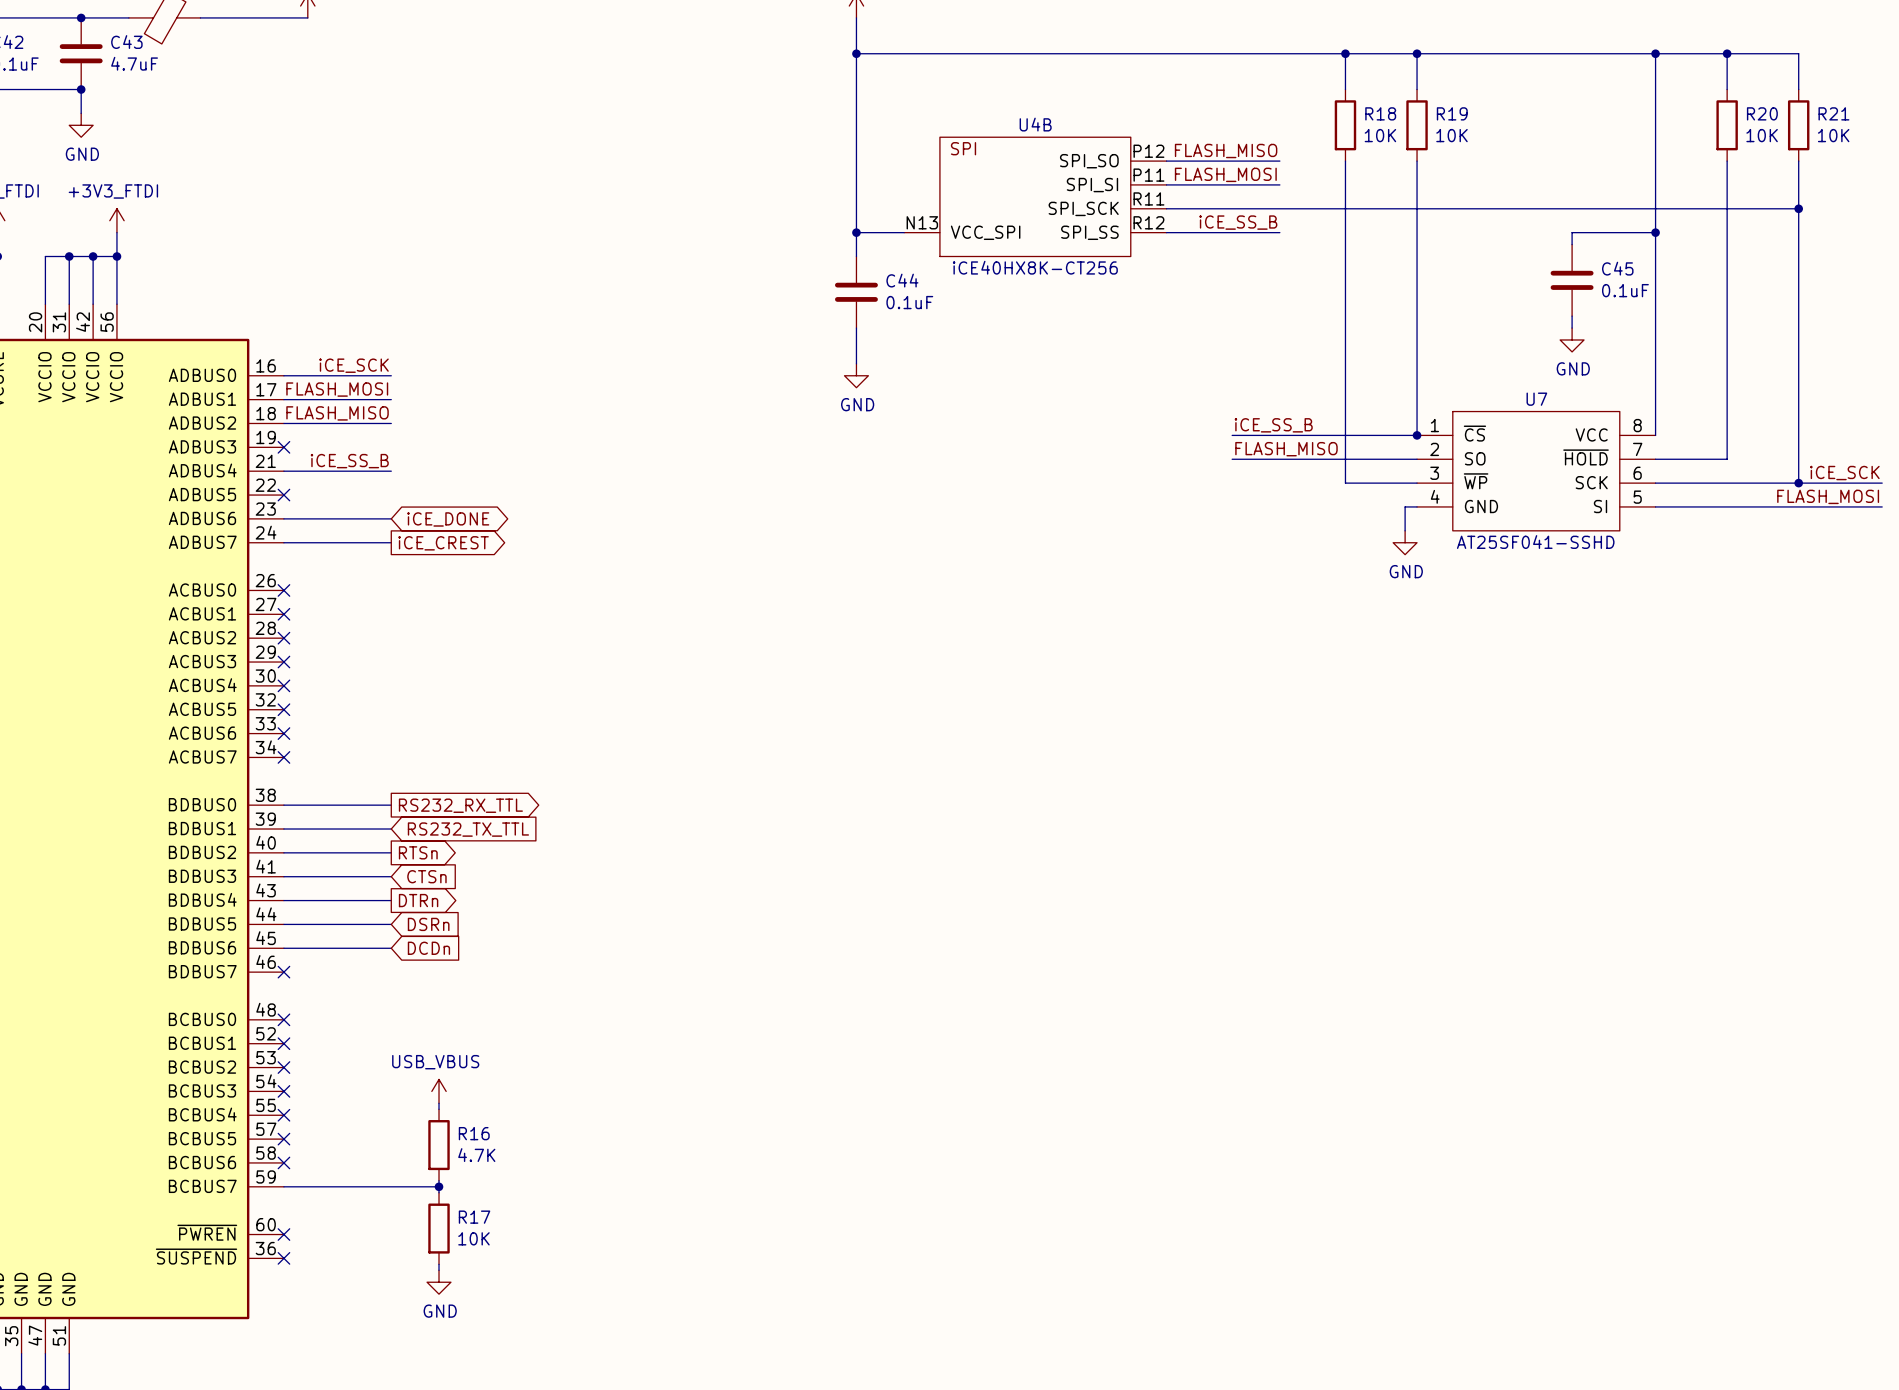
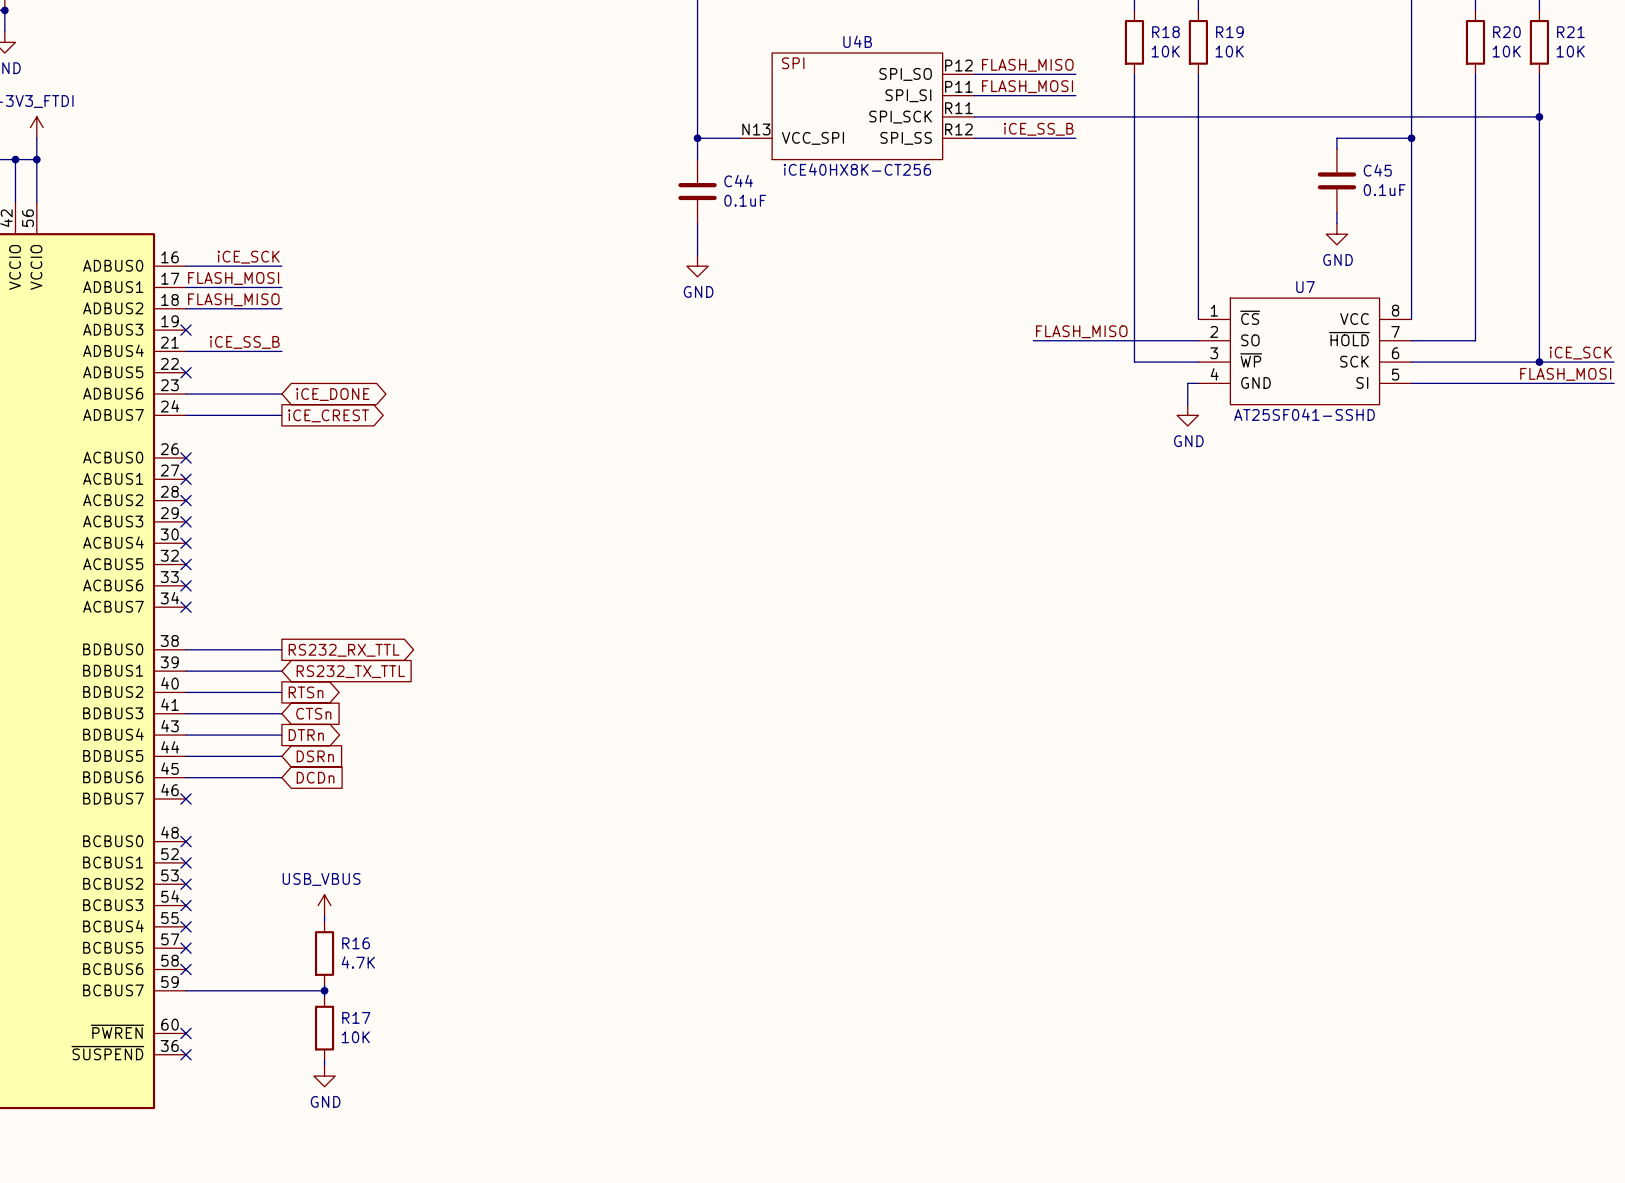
label: iCE_SS_B (1273, 425) -> none
wire: (1232, 435) (1417, 435) -> none
junction: (1417, 435) -> none

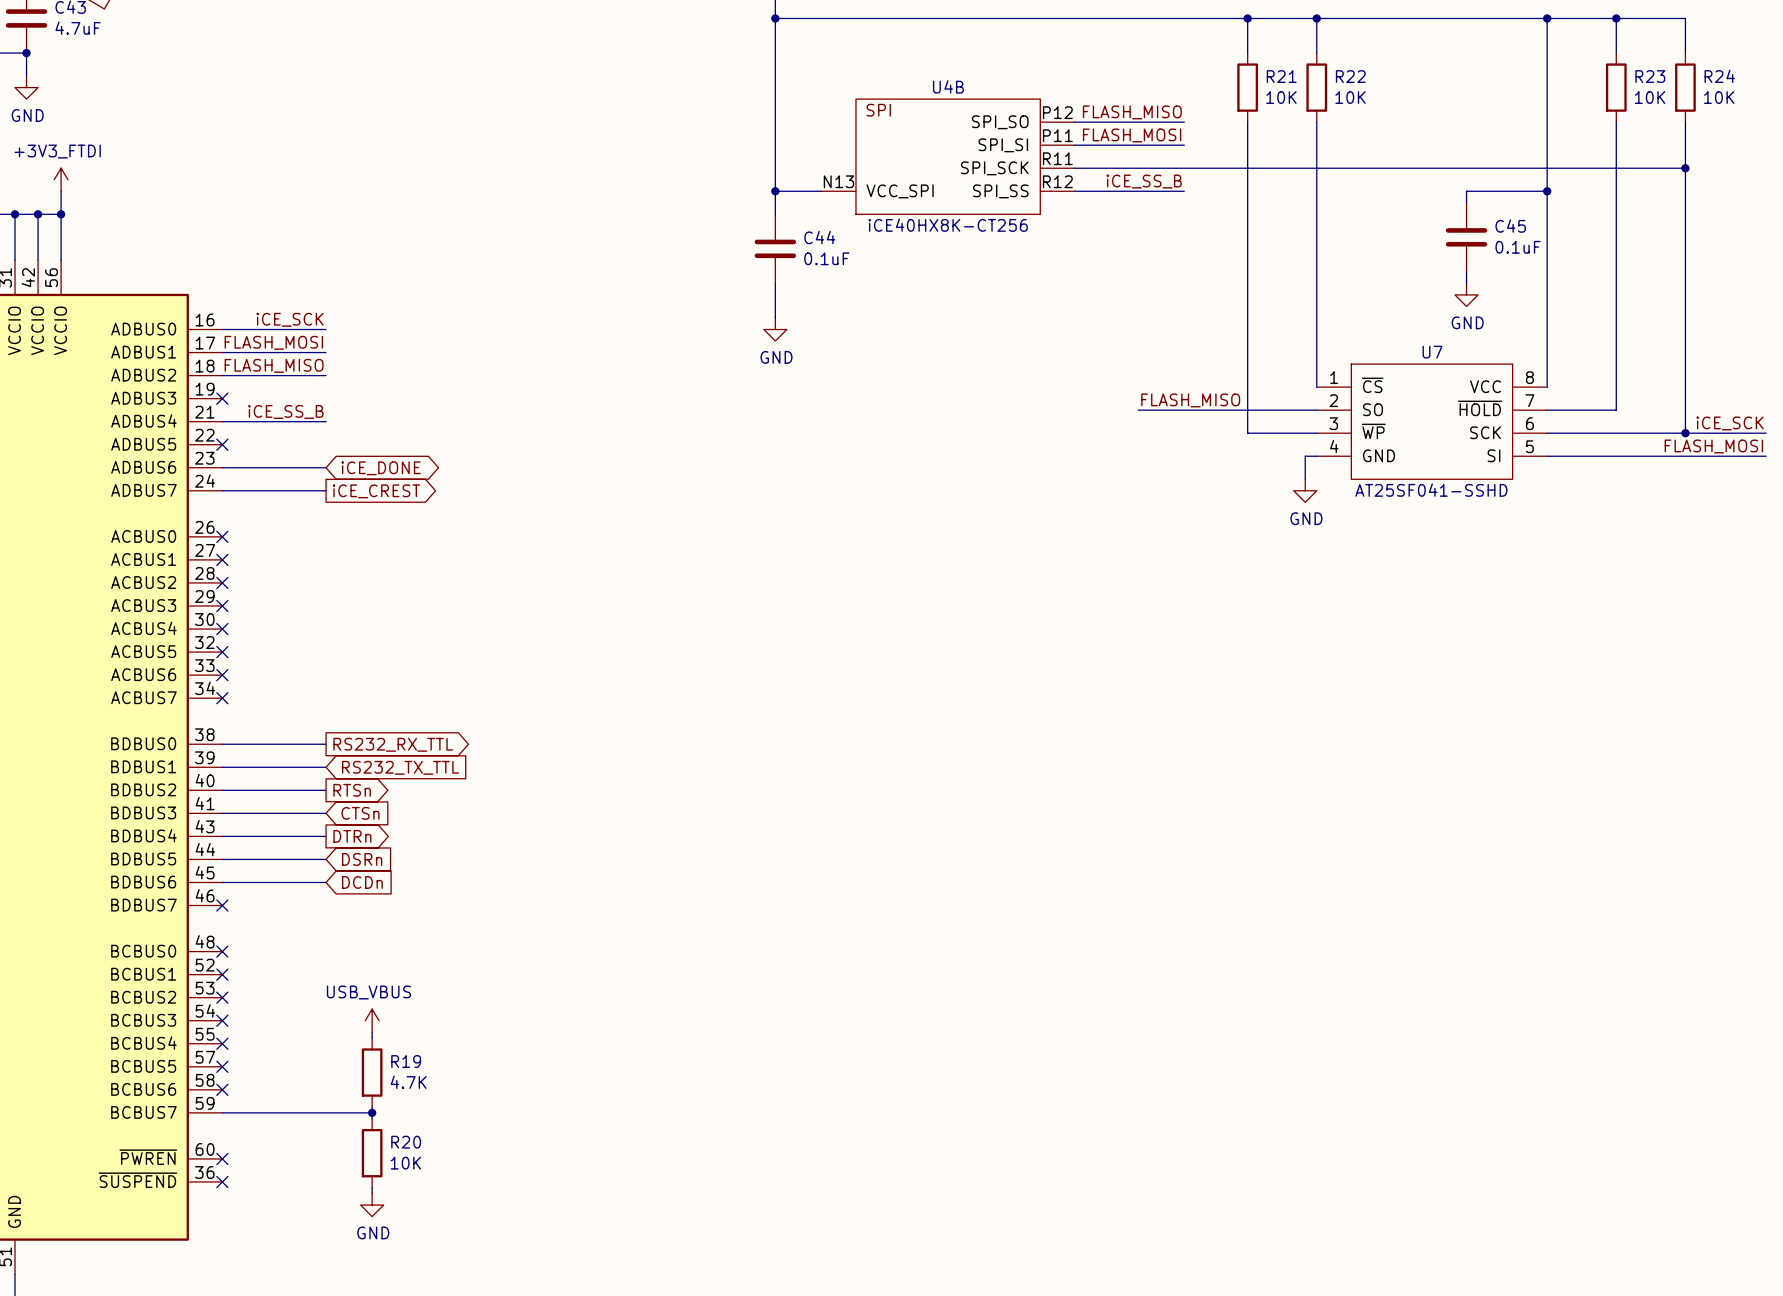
R18 name: R18 (1165, 32) -> R21 (1281, 76)
R19 name: R19 (1229, 32) -> R22 (1350, 76)
R20 name: R20 (1506, 32) -> R23 (1650, 76)
R21 name: R21 (1570, 32) -> R24 (1719, 76)
R16 name: R16 (356, 943) -> R19 (406, 1061)
R17 name: R17 (356, 1017) -> R20 (406, 1142)

